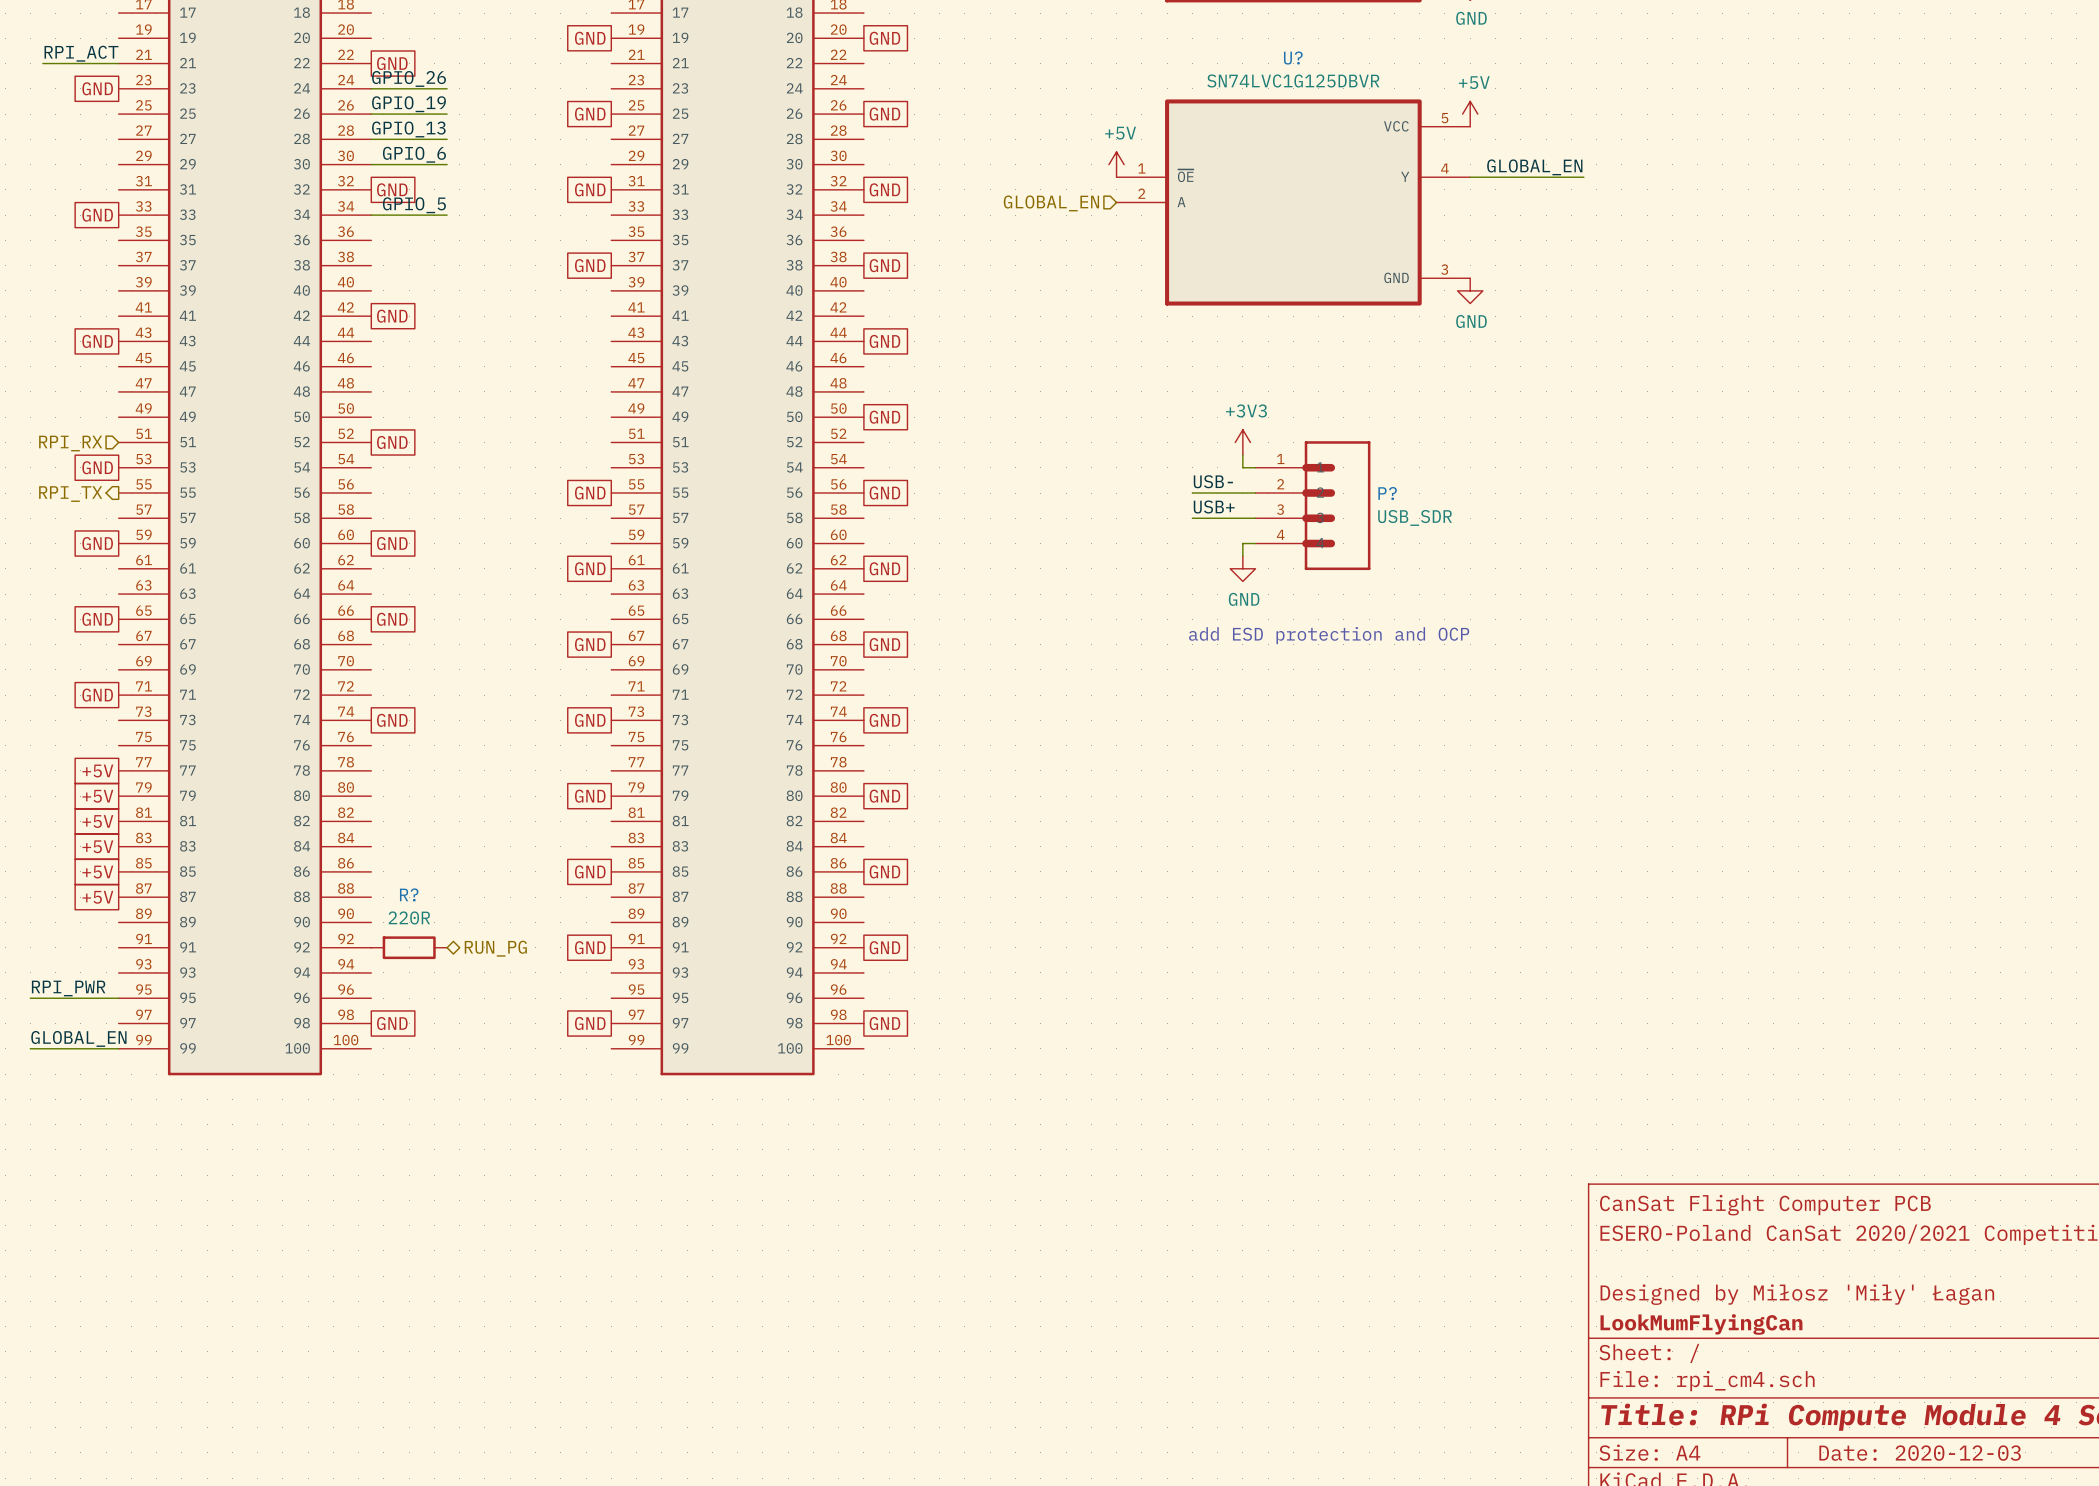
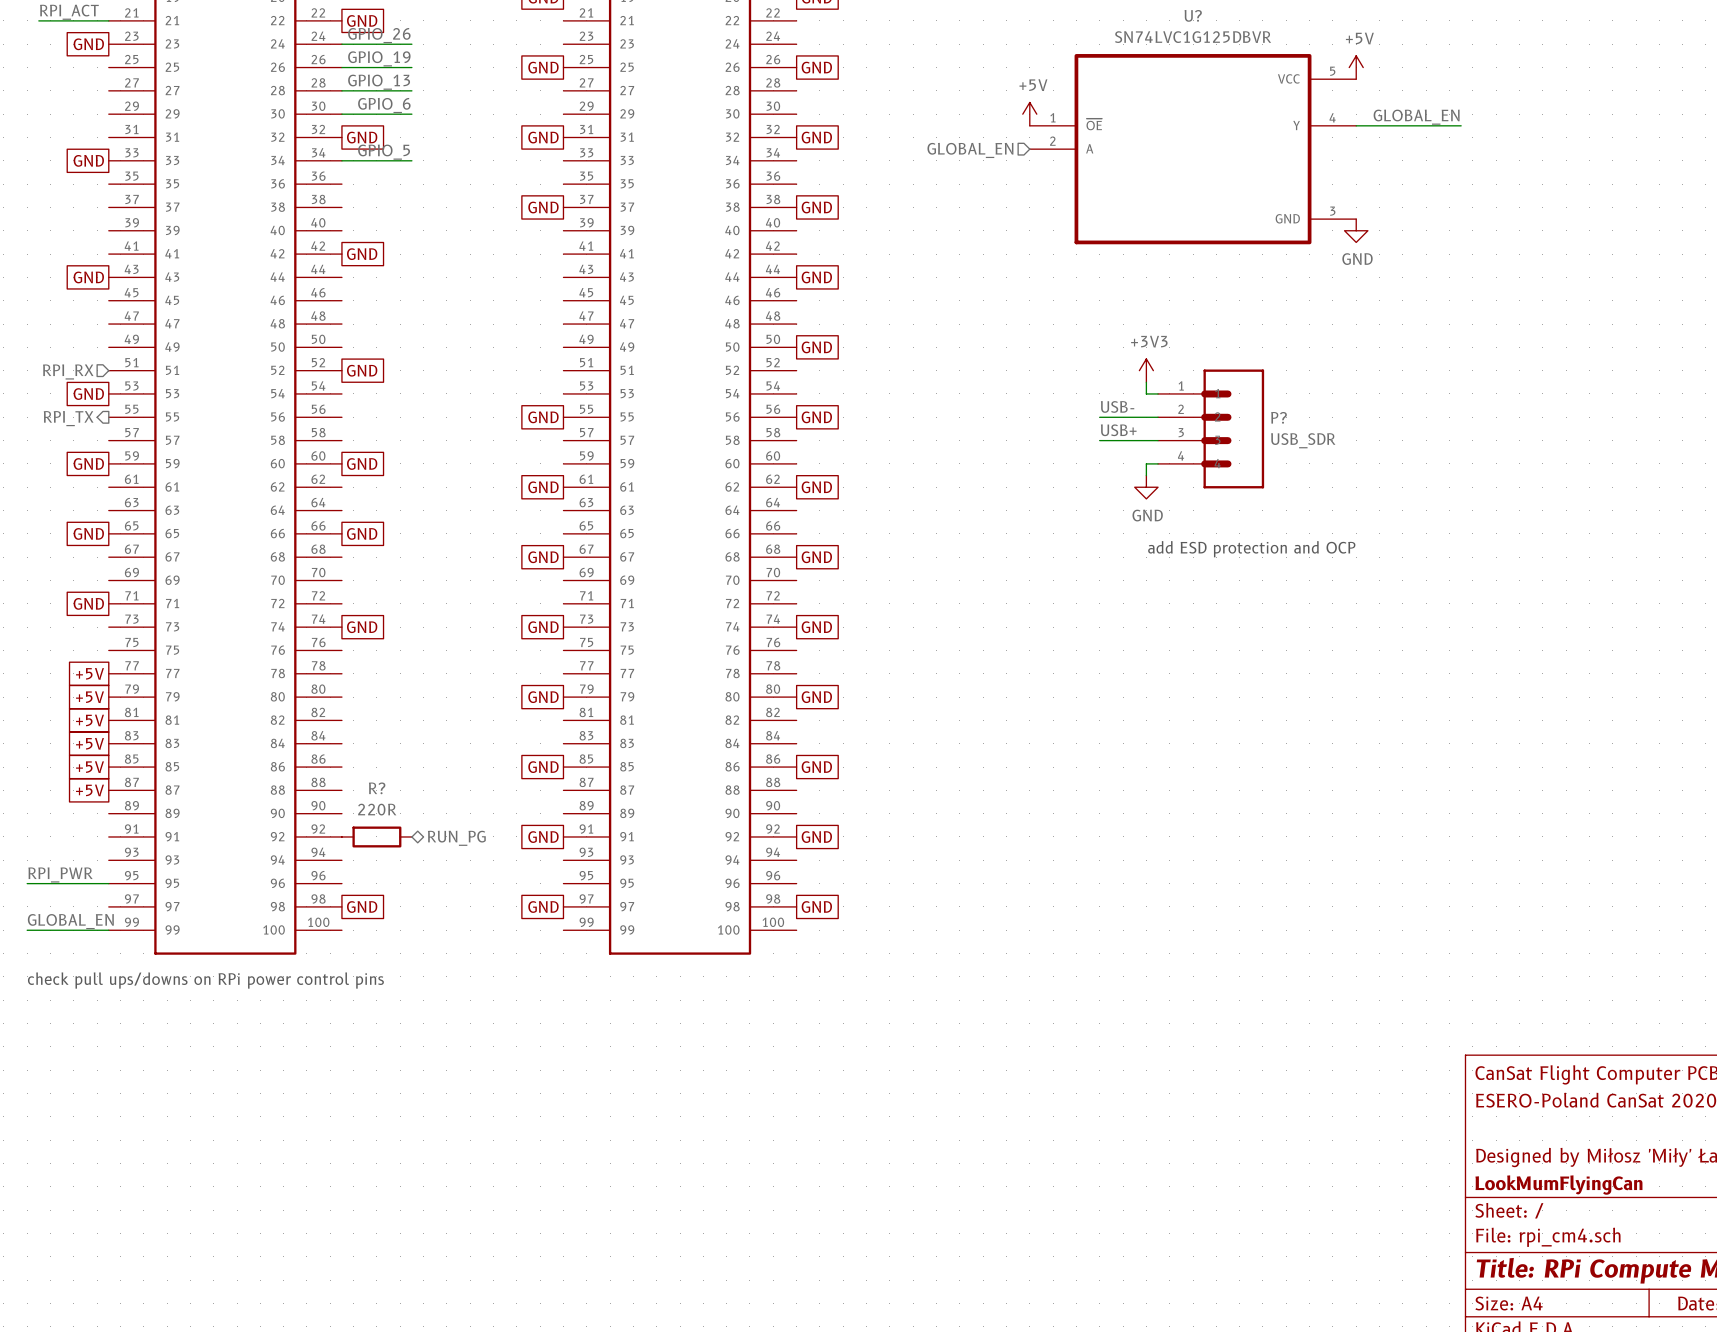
text: none -> check pull ups/downs on RPi power control pins (205, 980)

